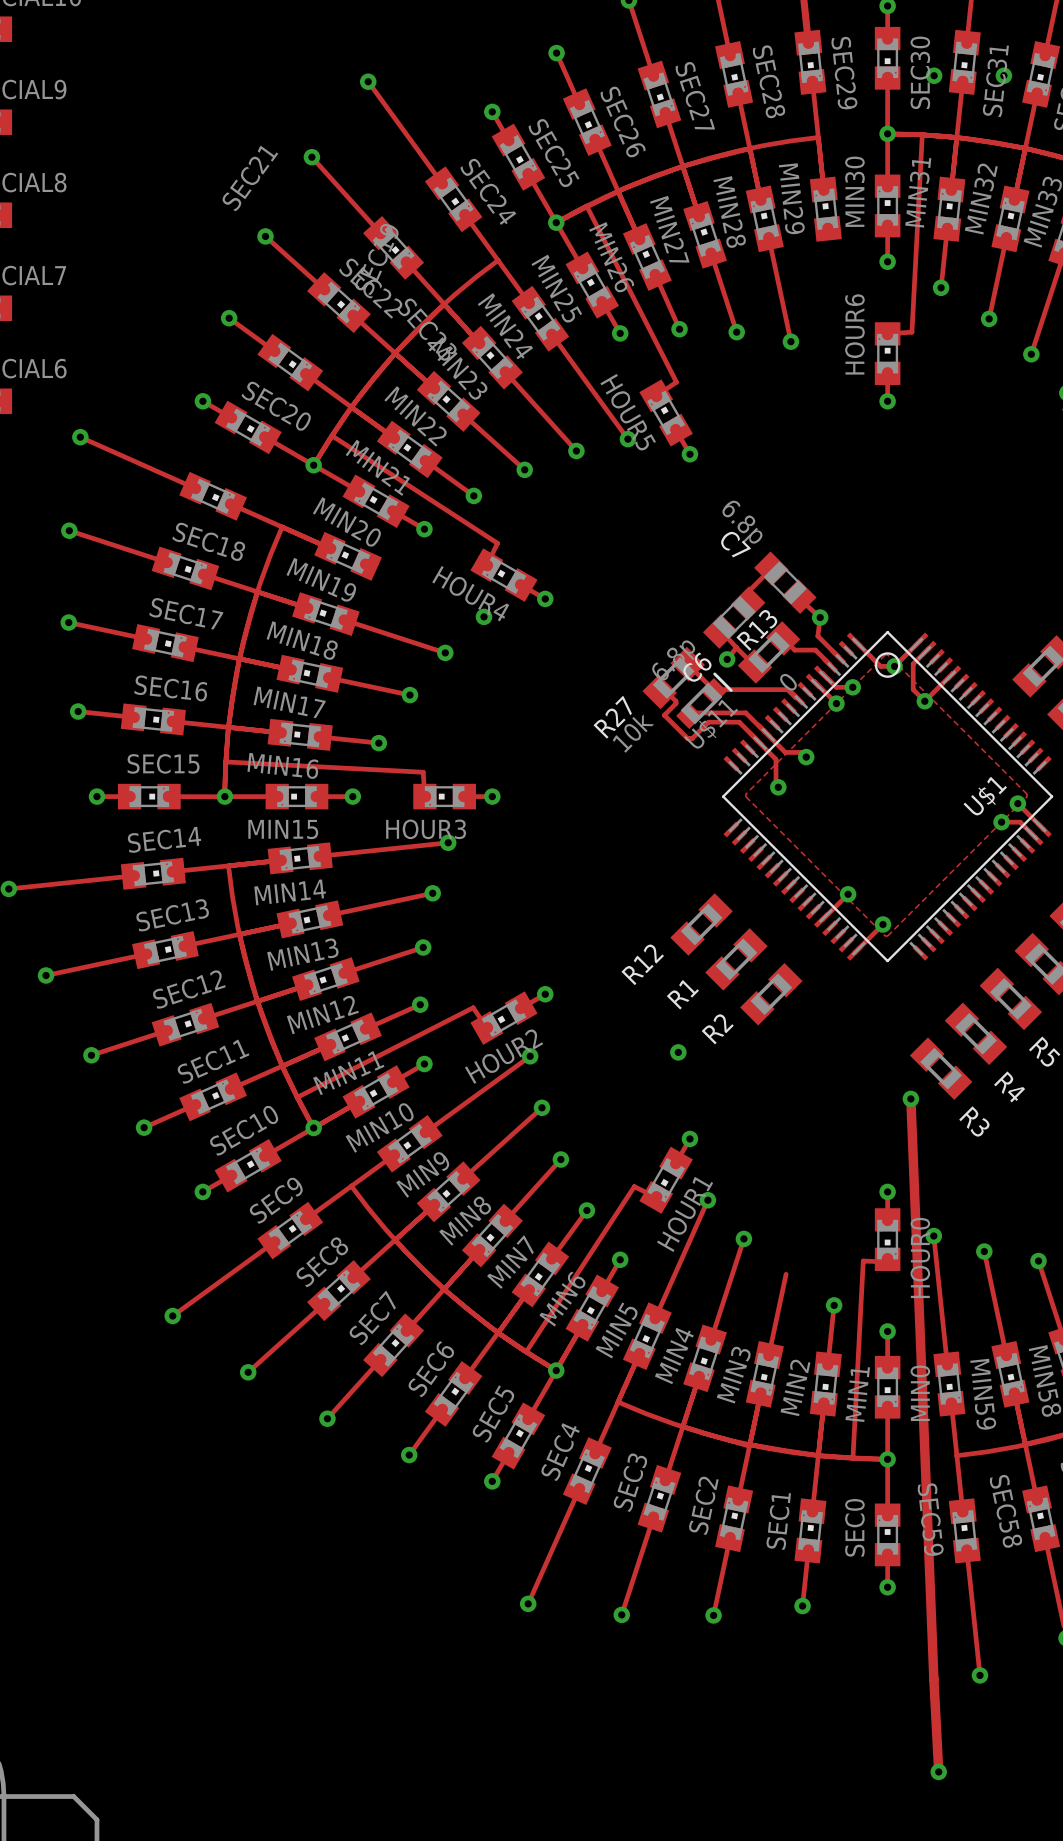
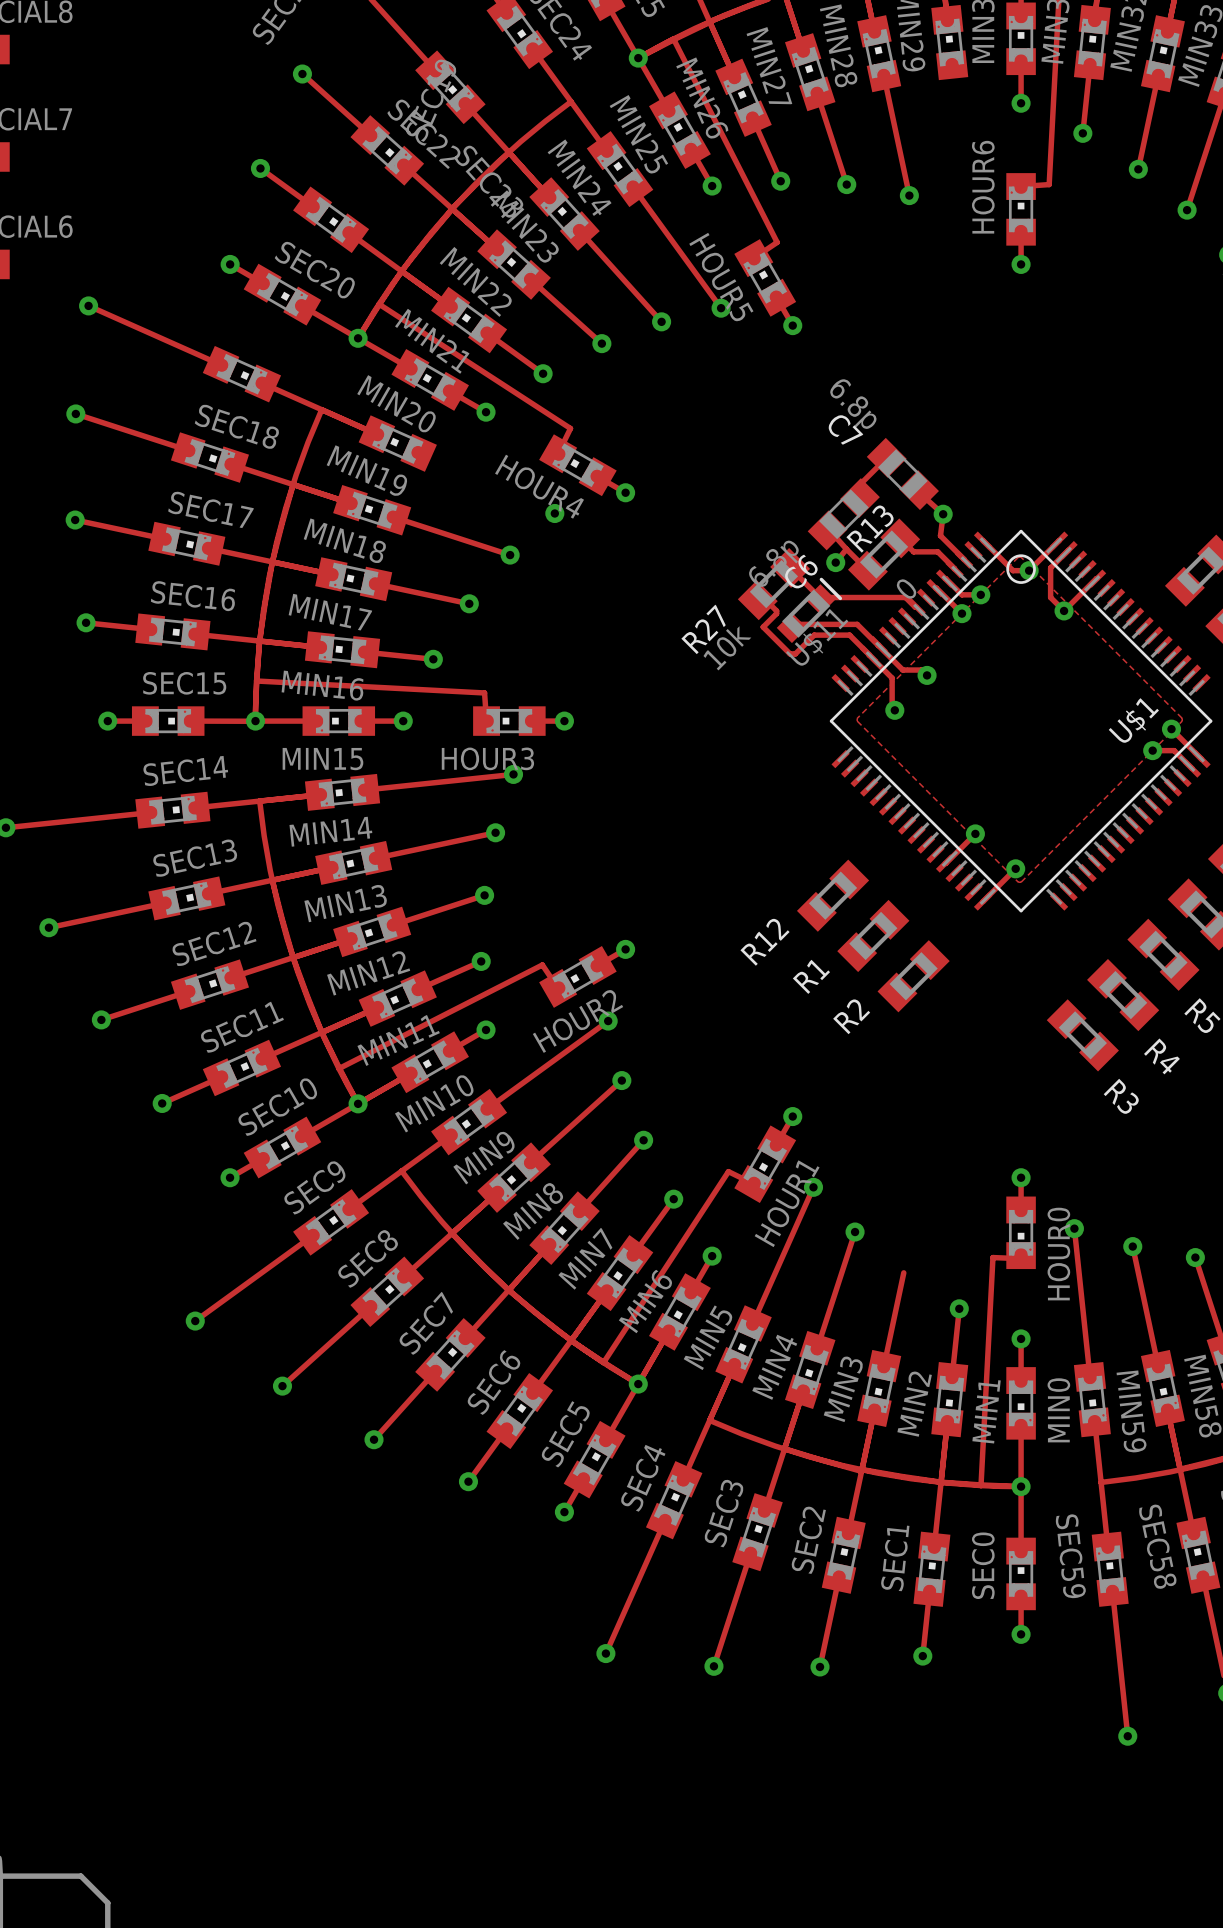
R12 position: (701, 924) -> (833, 895)
R1 position: (736, 959) -> (873, 935)
R2 position: (771, 994) -> (913, 976)
via: (678, 1052) -> none
track: (910, 1098) (938, 1771) -> none
via: (910, 1098) -> none
via: (938, 1771) -> none

